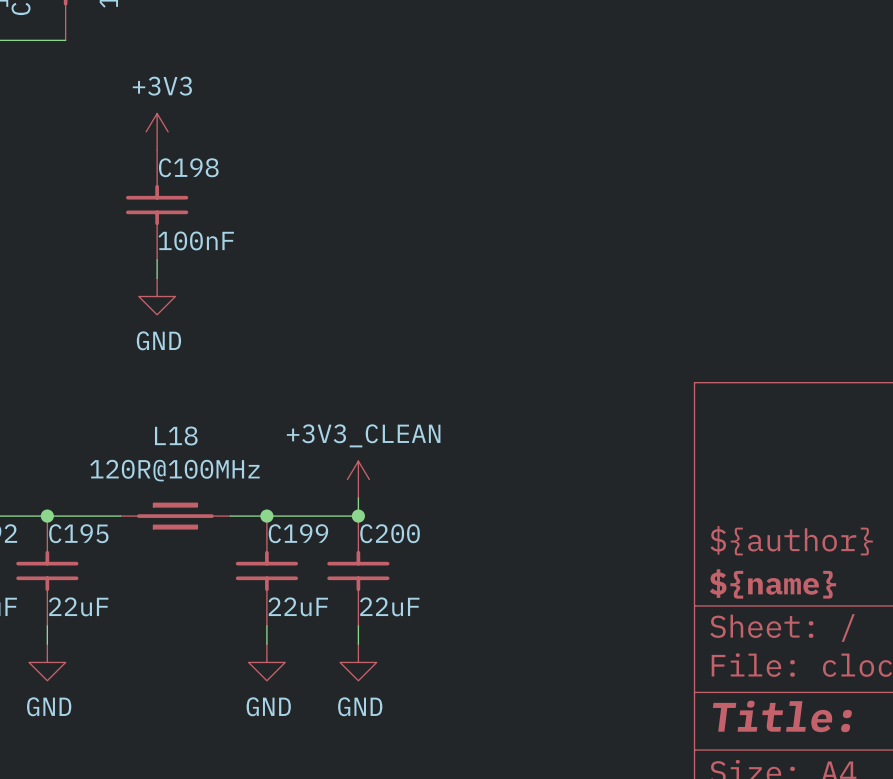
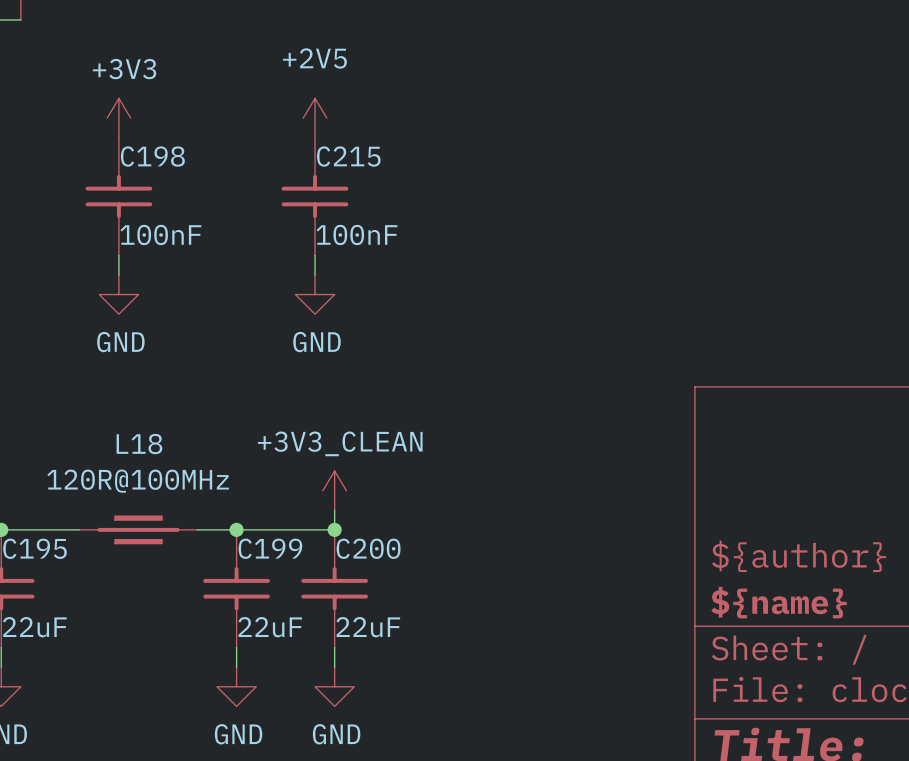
power symbol: none -> +2V5 (315, 118)
C215: none -> (315, 196)
wire: none -> (315, 255) (315, 274)
power symbol: none -> GND (315, 294)

